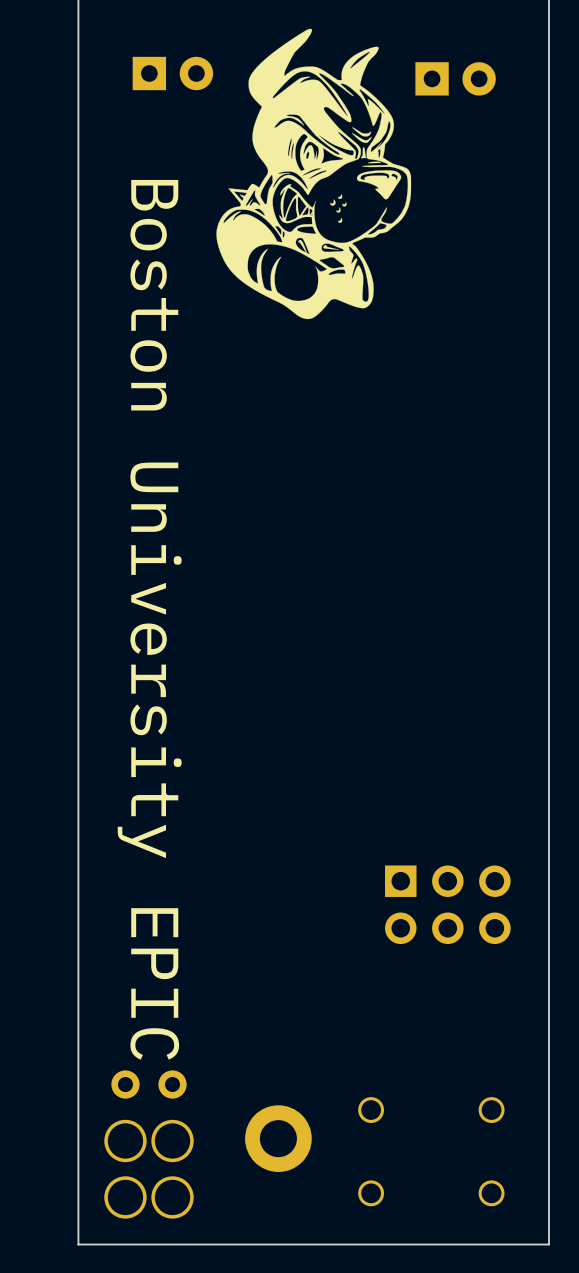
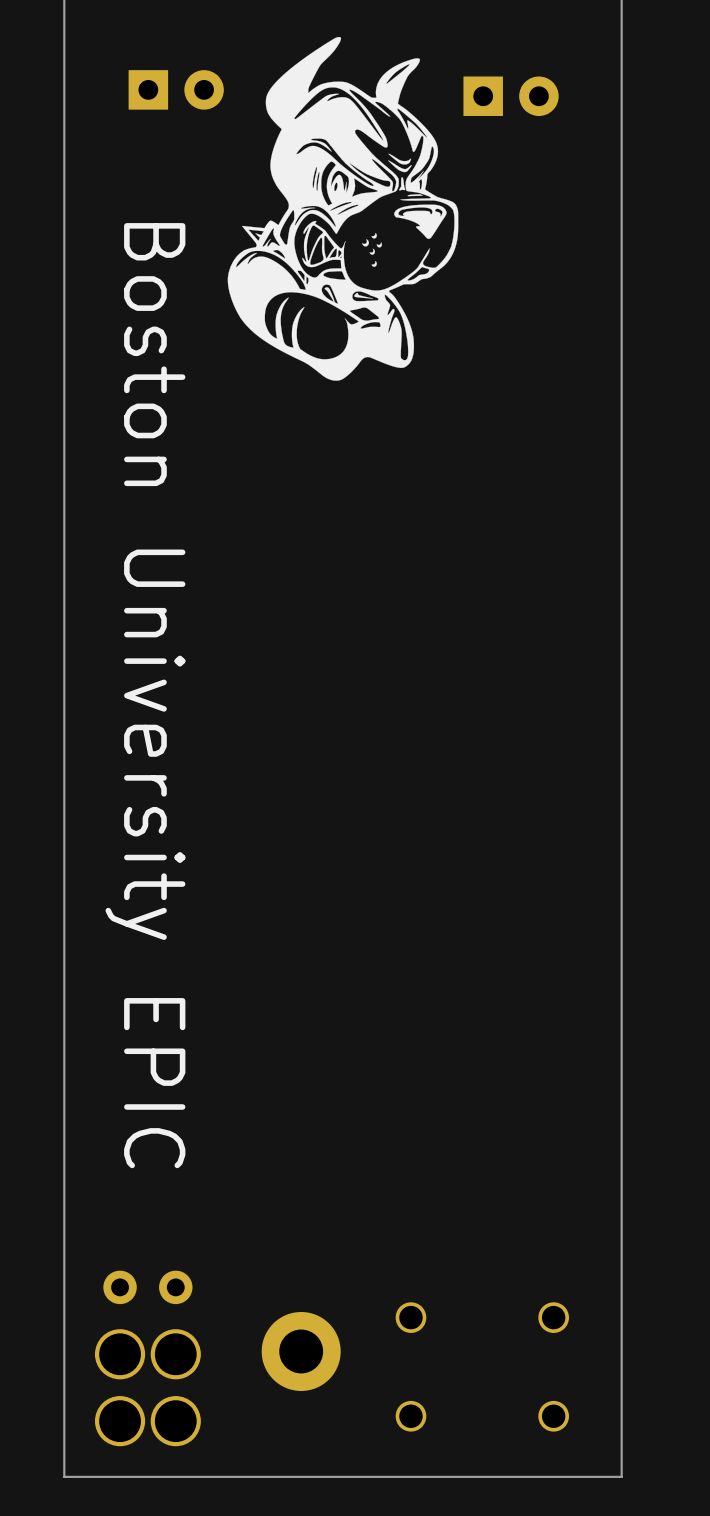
part: (447, 904) -> none

